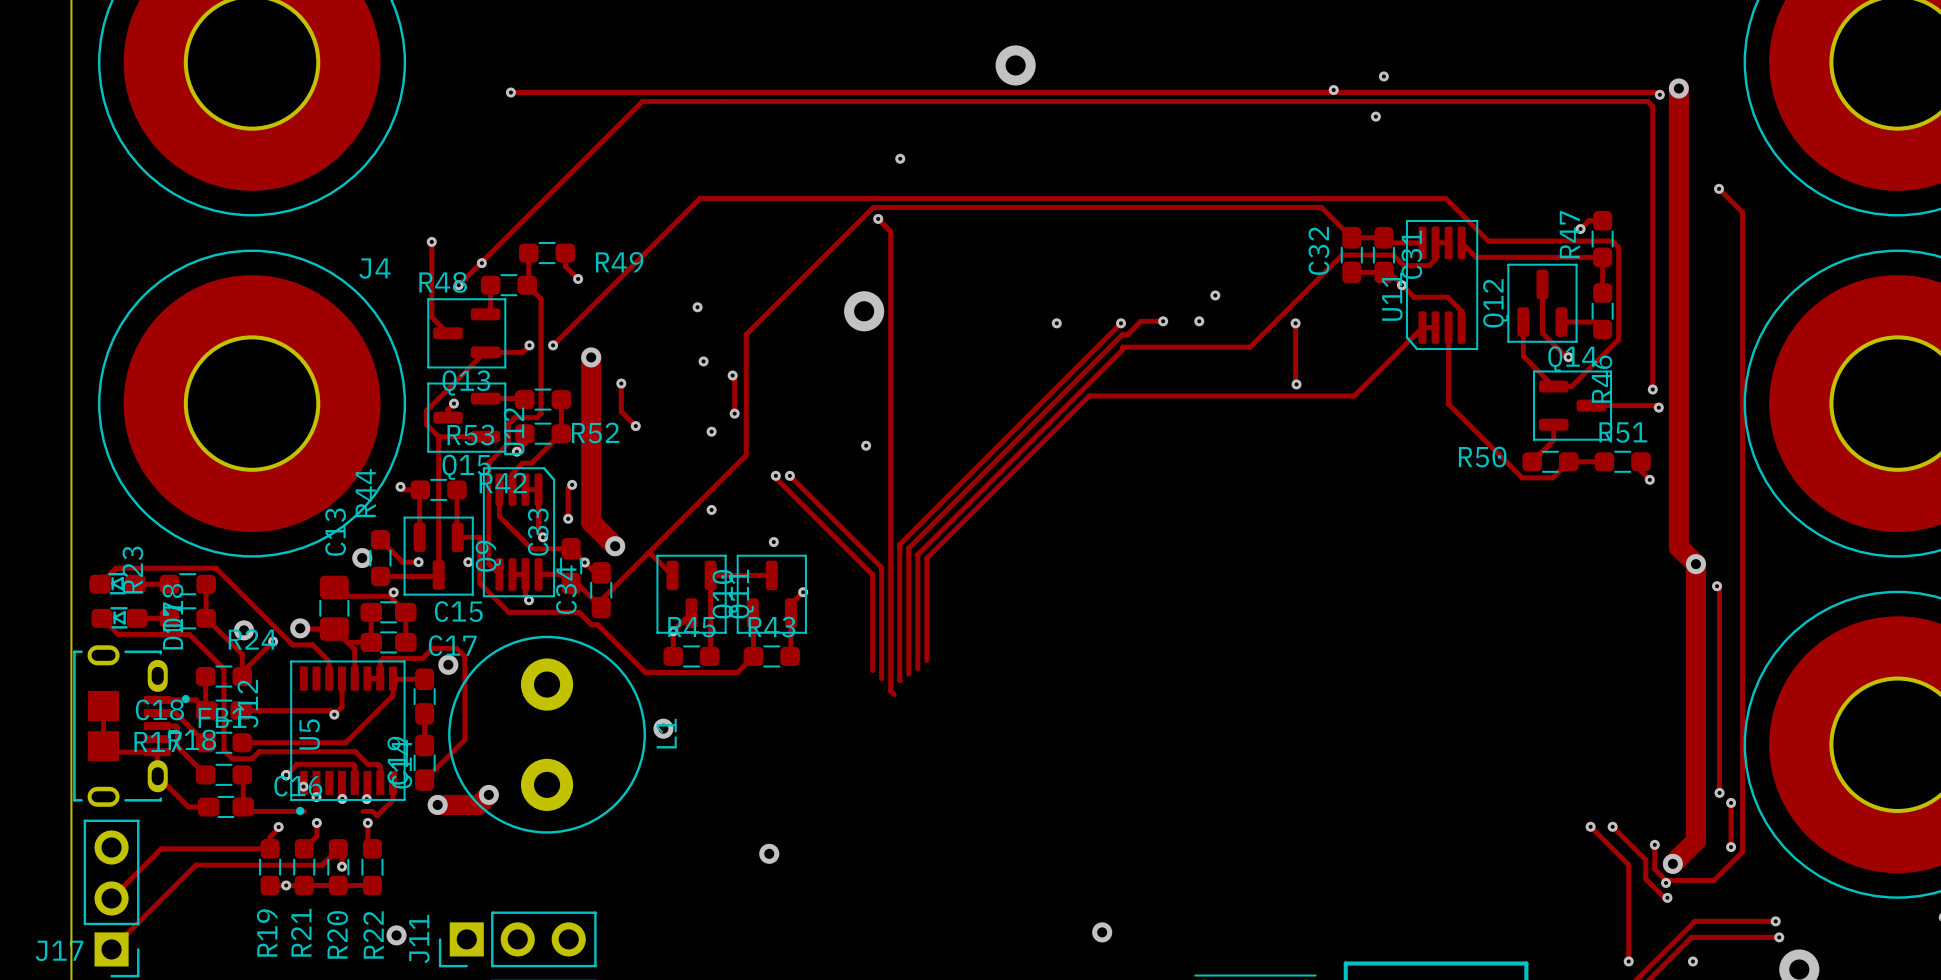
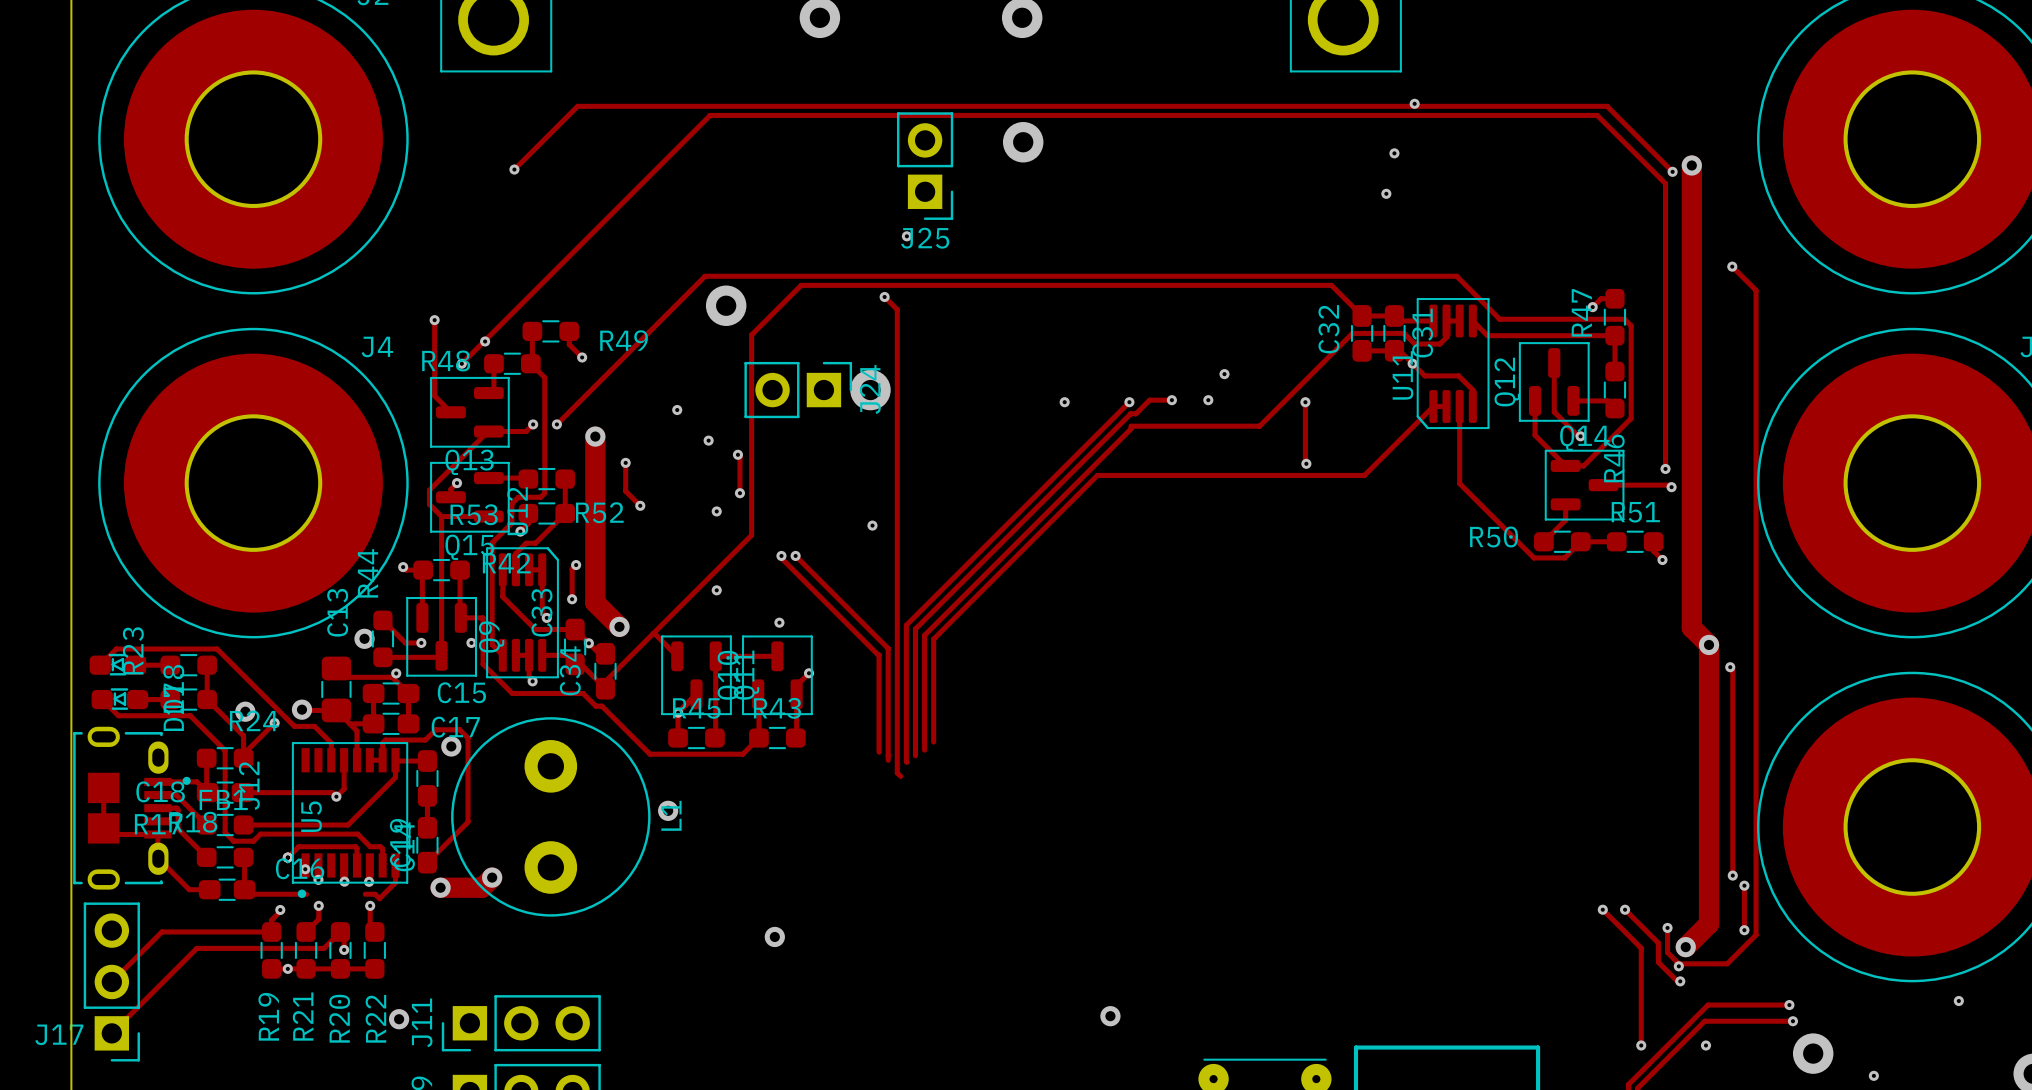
J25: none -> (925, 166)
via position: (1333, 90) -> (1414, 103)
track: (510, 92) (1657, 92) -> (514, 169) (577, 106) (1607, 106) (1670, 169)
track: (642, 101) (1647, 101) -> (646, 178) (710, 115) (1597, 115) (1660, 178)
track: (873, 207) (746, 334) -> (879, 285) (801, 285) (751, 334) (751, 413)
via: none -> (726, 305)
via position: (697, 307) -> (677, 410)
J24: none -> (798, 390)

